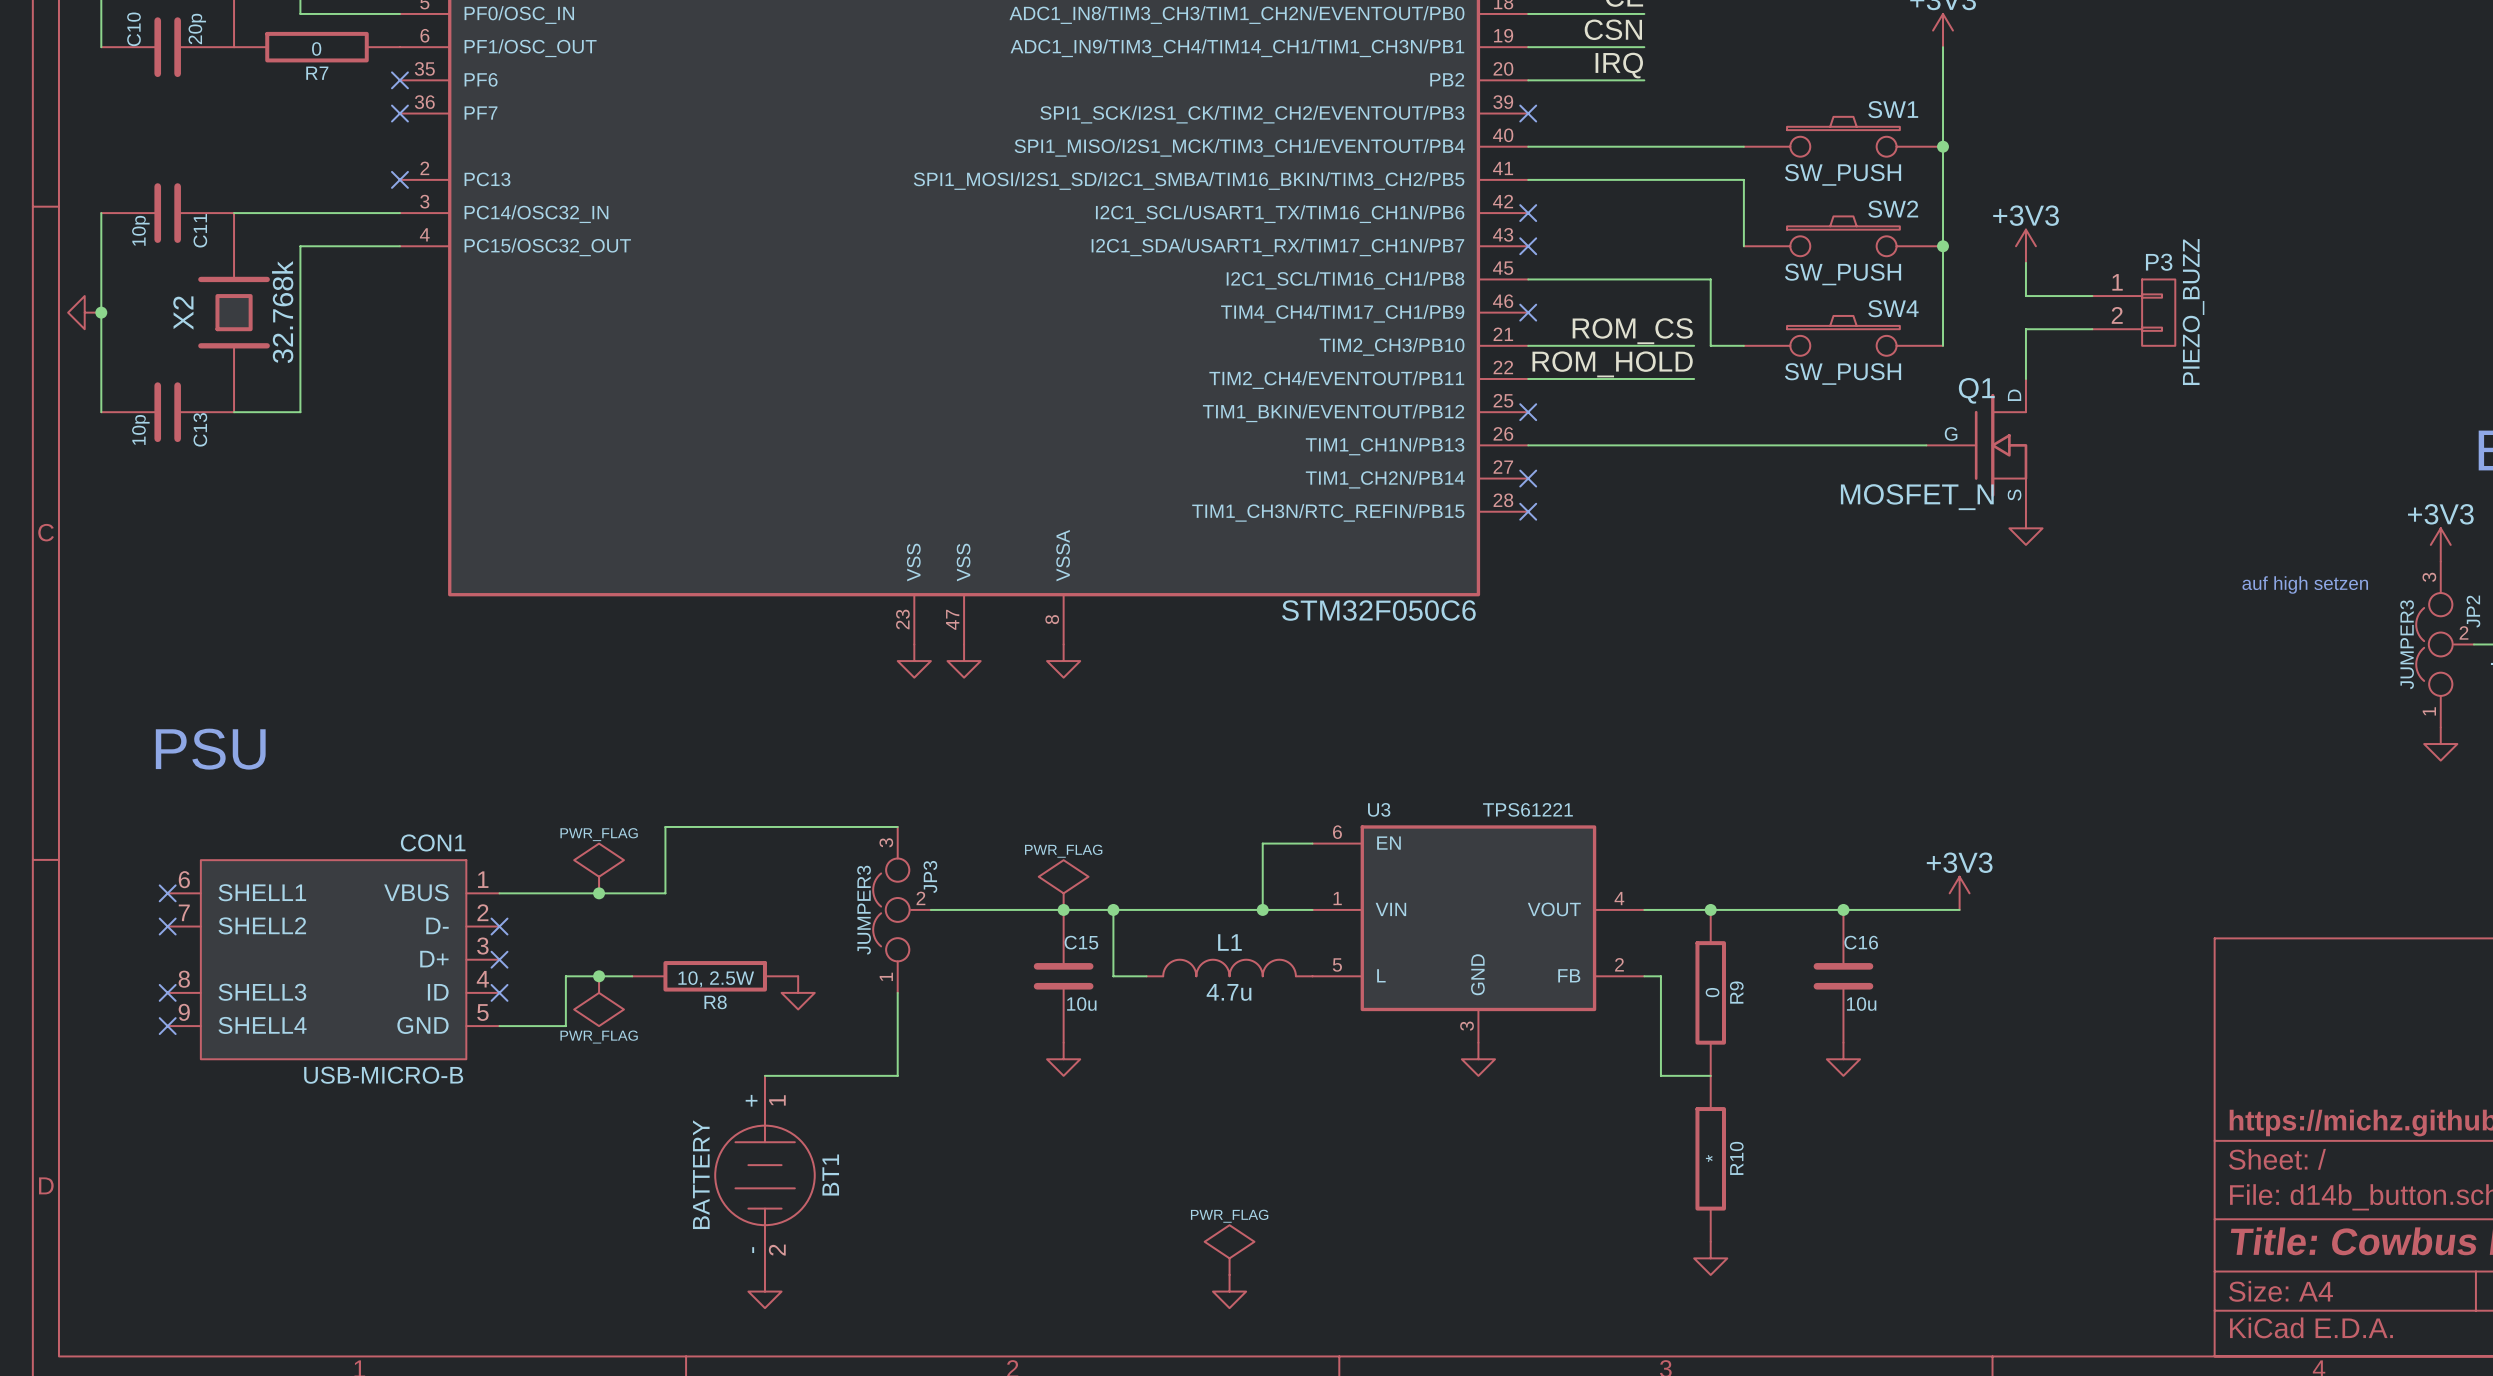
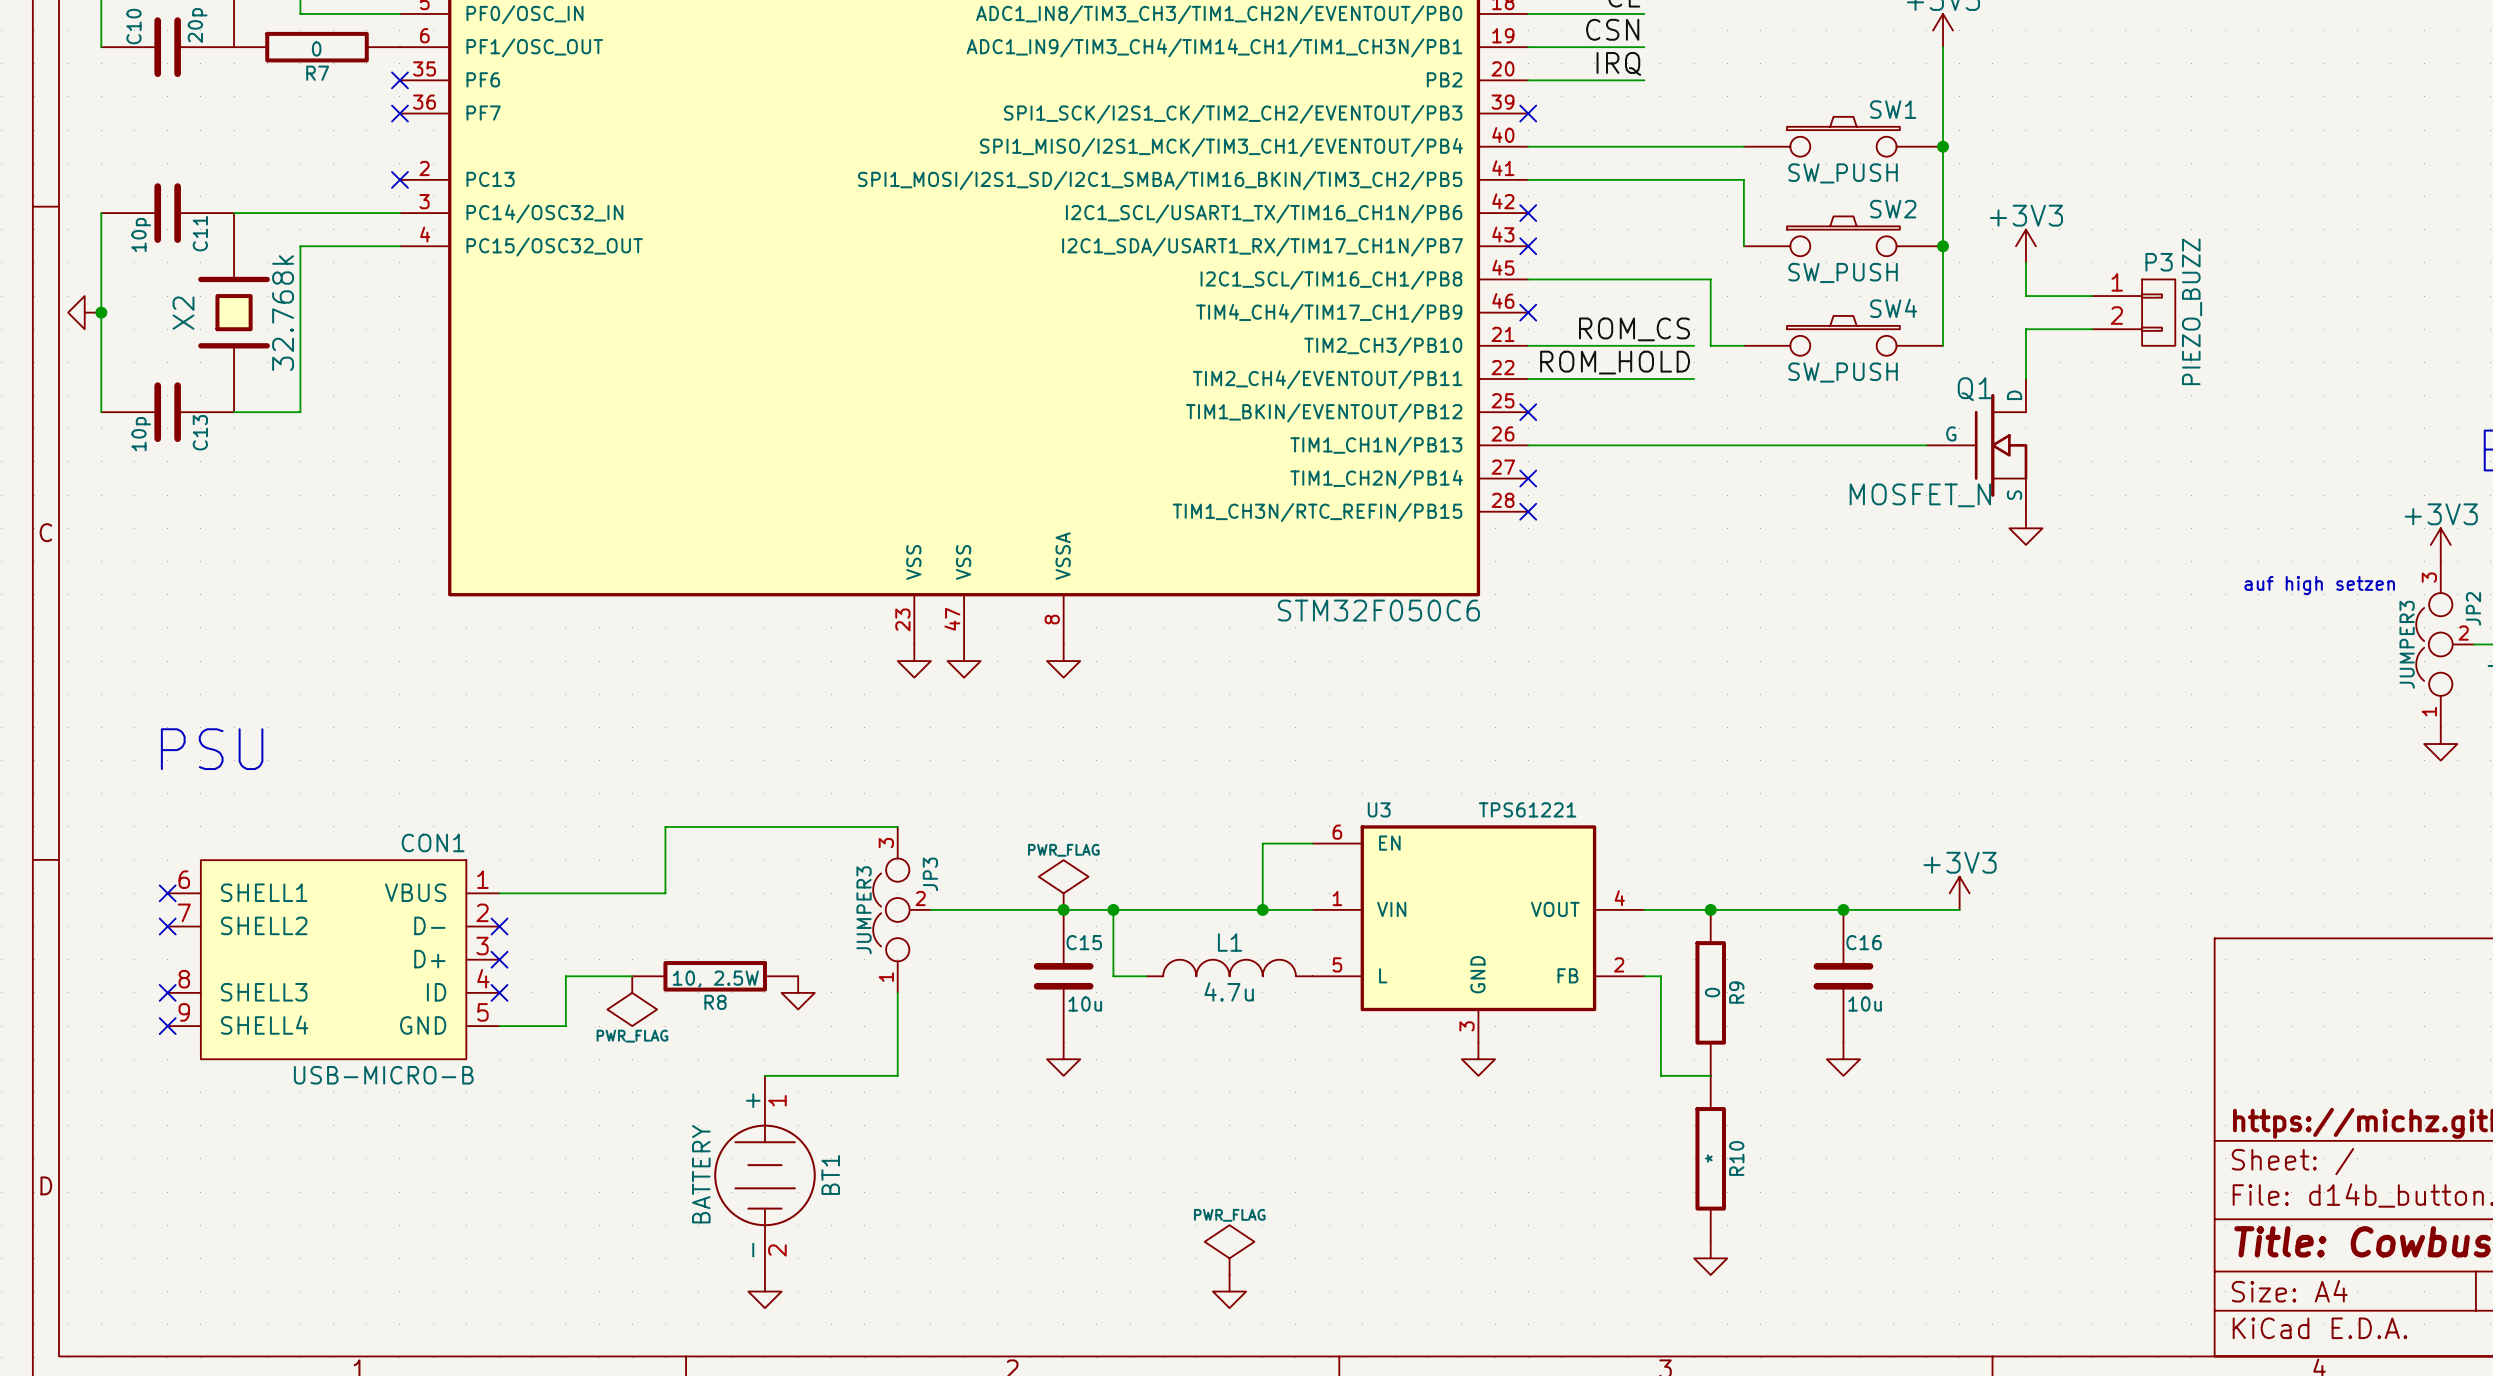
power symbol: PWR_FLAG (599, 868) -> none
junction: (599, 893) -> none
junction: (599, 976) -> none
power symbol position: PWR_FLAG (599, 1001) -> PWR_FLAG (632, 1001)

